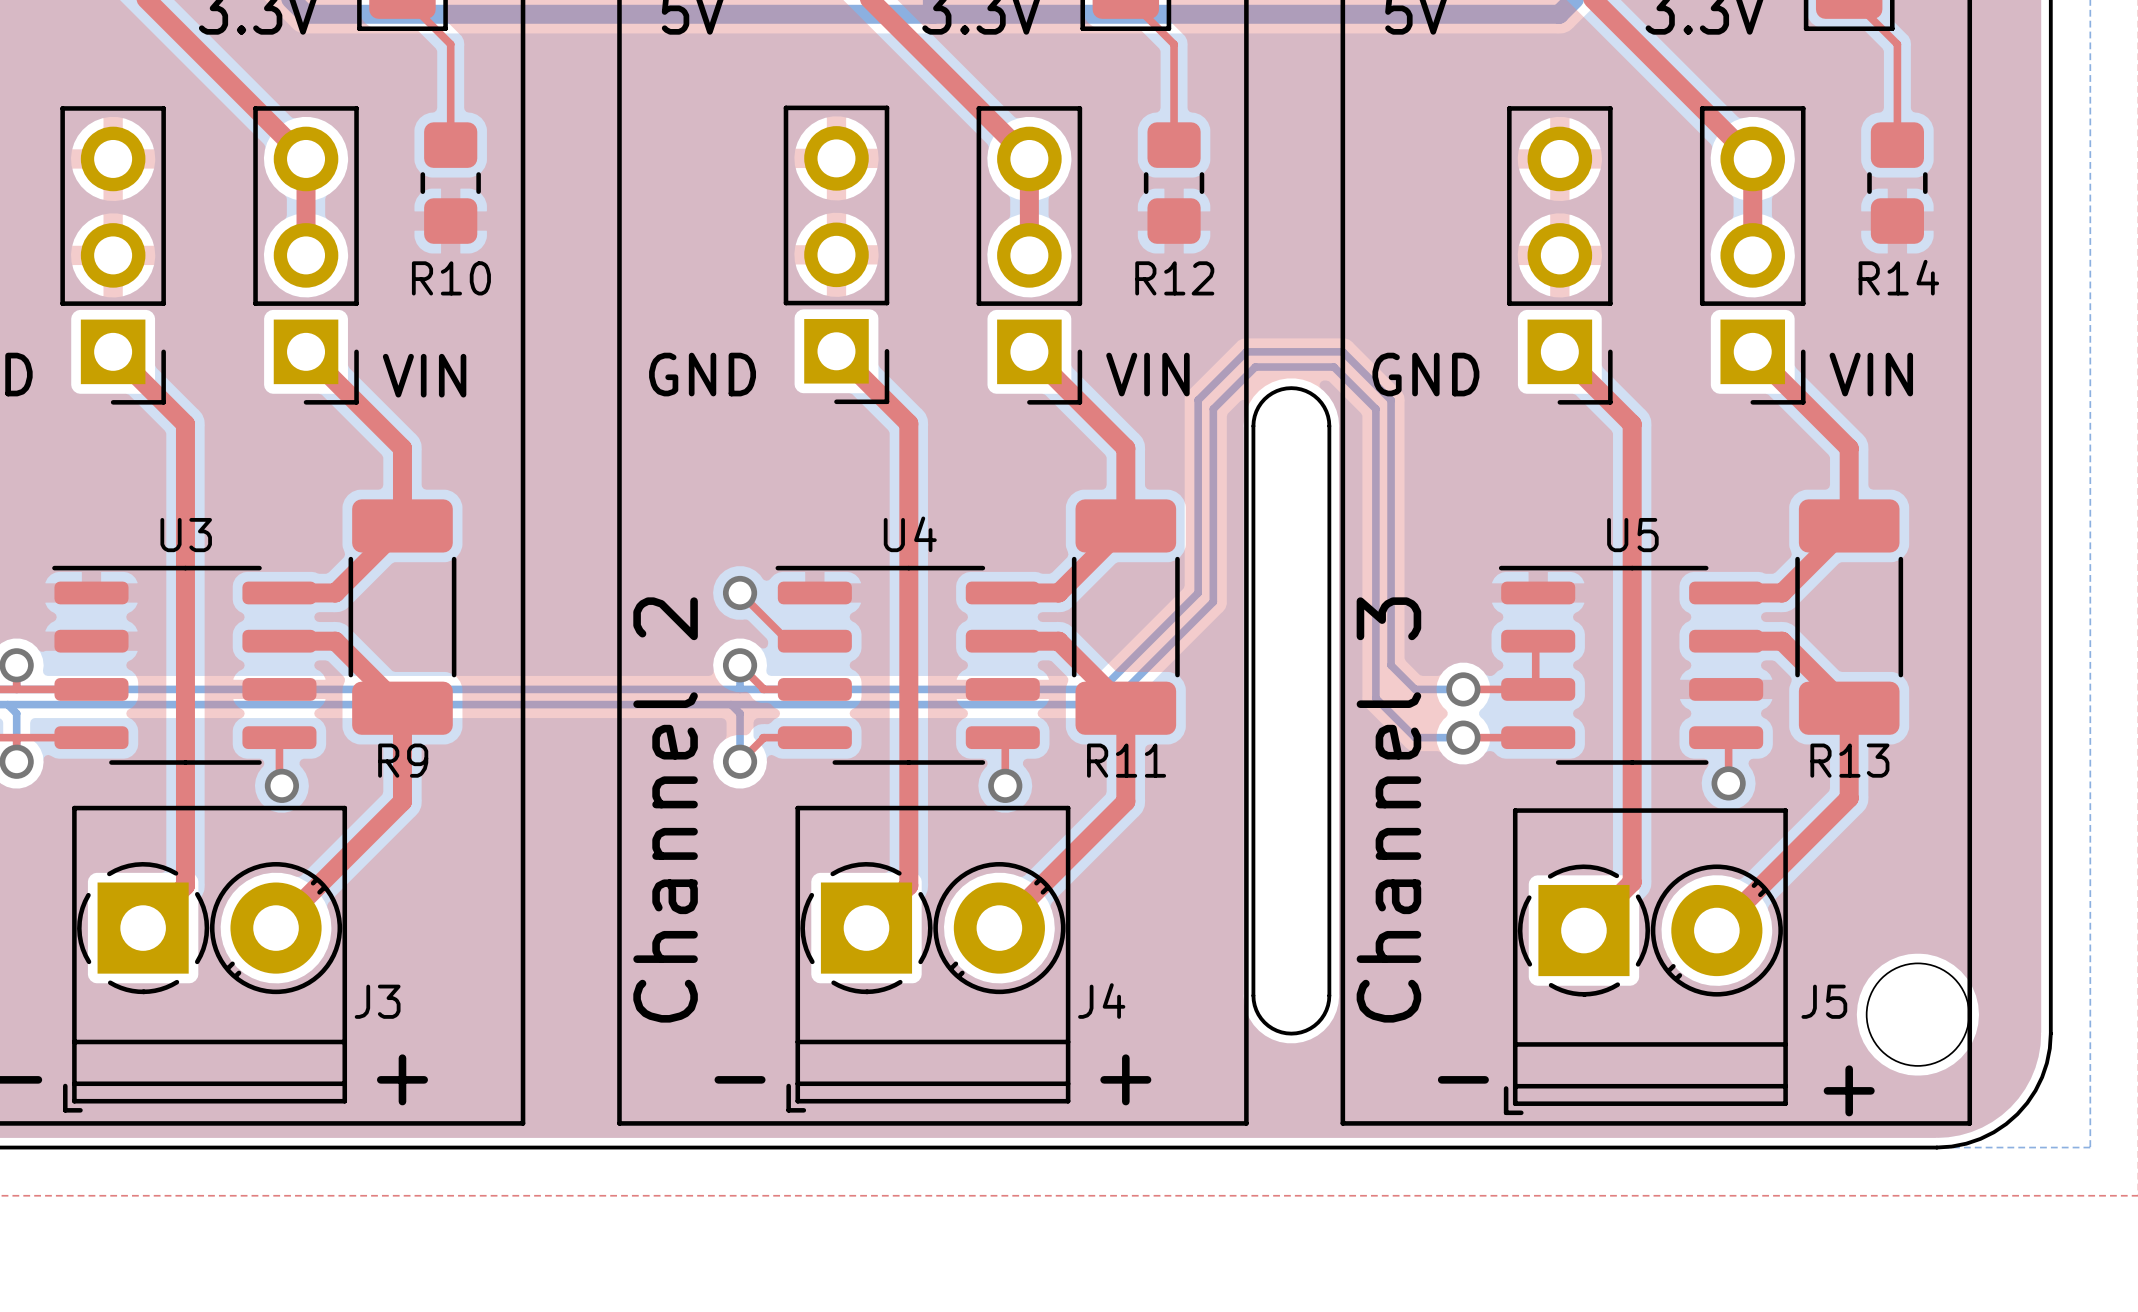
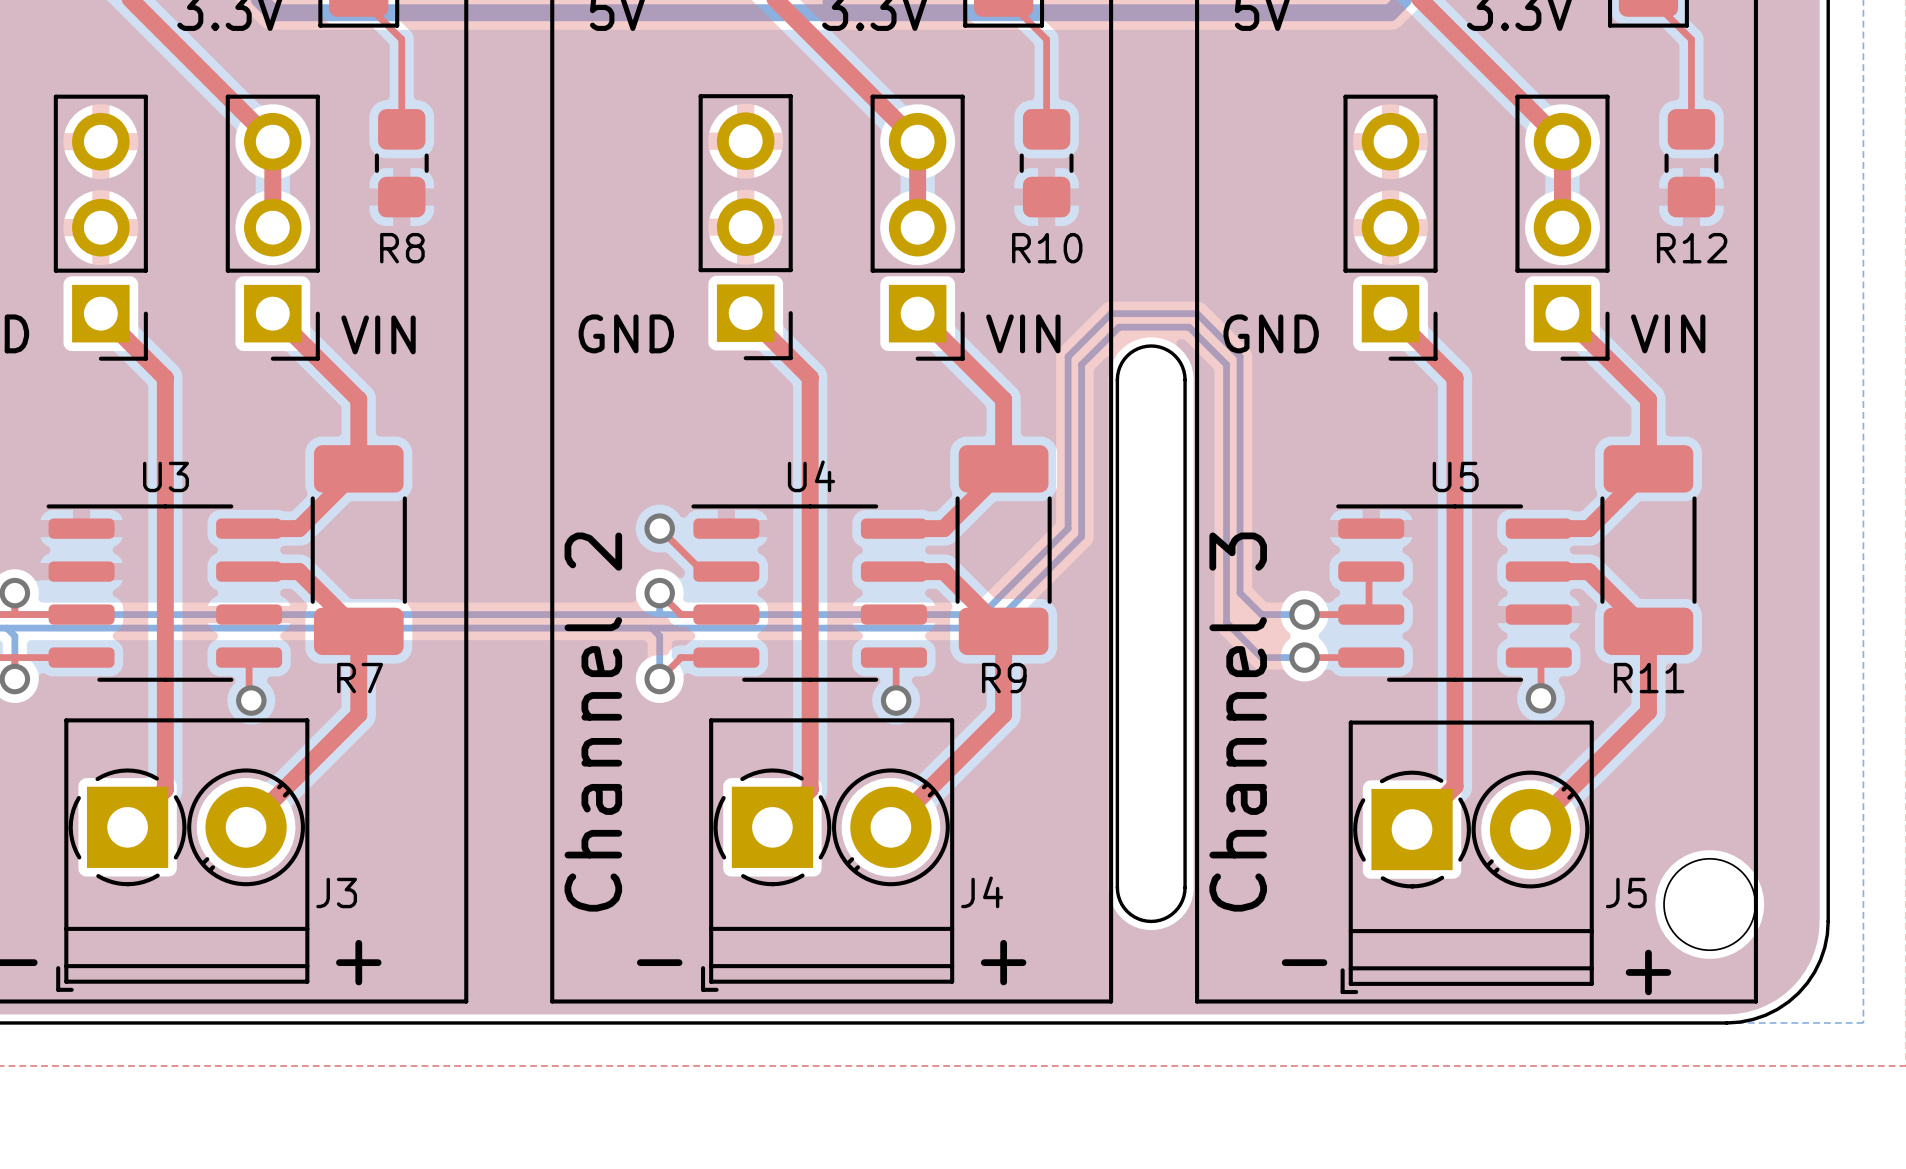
R14 name: R14 (1898, 277) -> R12 (1692, 248)
R10 name: R10 (451, 278) -> R8 (402, 248)
R12 name: R12 (1174, 278) -> R10 (1047, 248)
R9 name: R9 (403, 760) -> R7 (360, 678)
R11 name: R11 (1126, 760) -> R9 (1004, 678)
R13 name: R13 (1849, 760) -> R11 (1649, 678)

